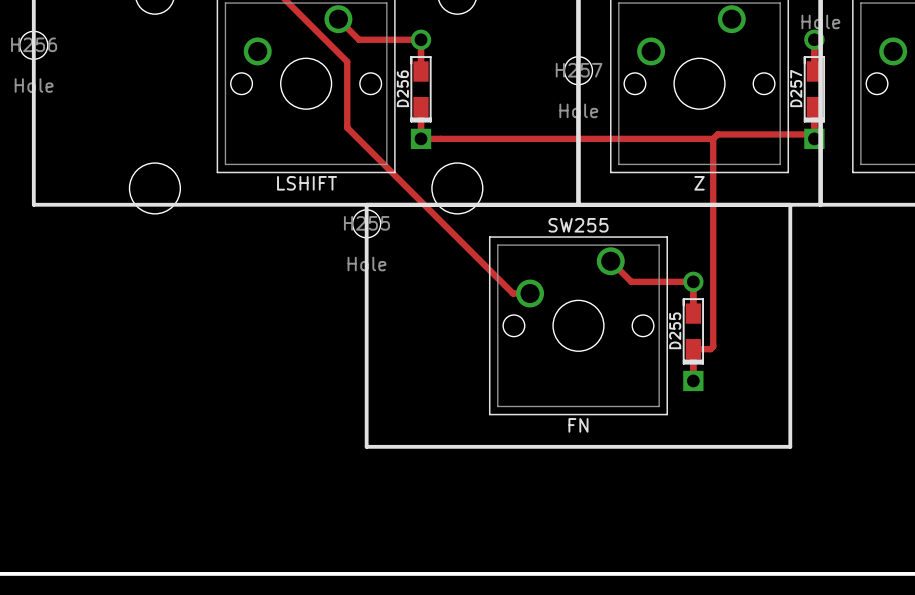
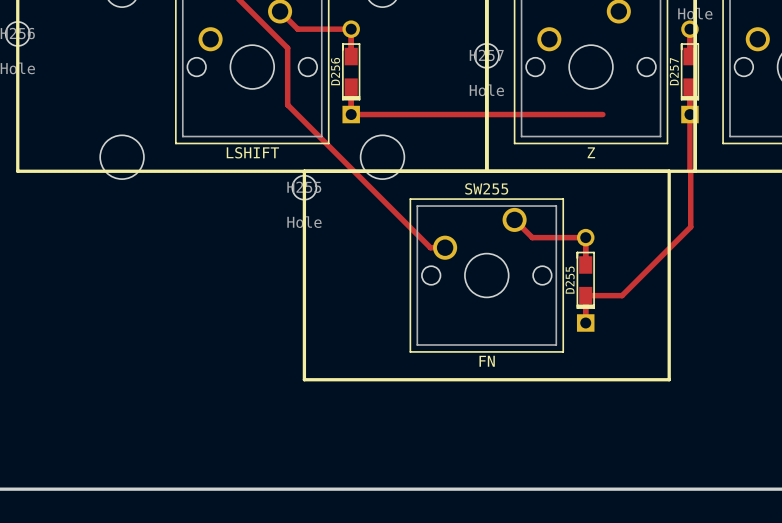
track: (814, 134) (717, 134) (713, 138) (713, 346) (710, 349) -> (689, 114) (690, 227) (622, 295) (600, 295)

